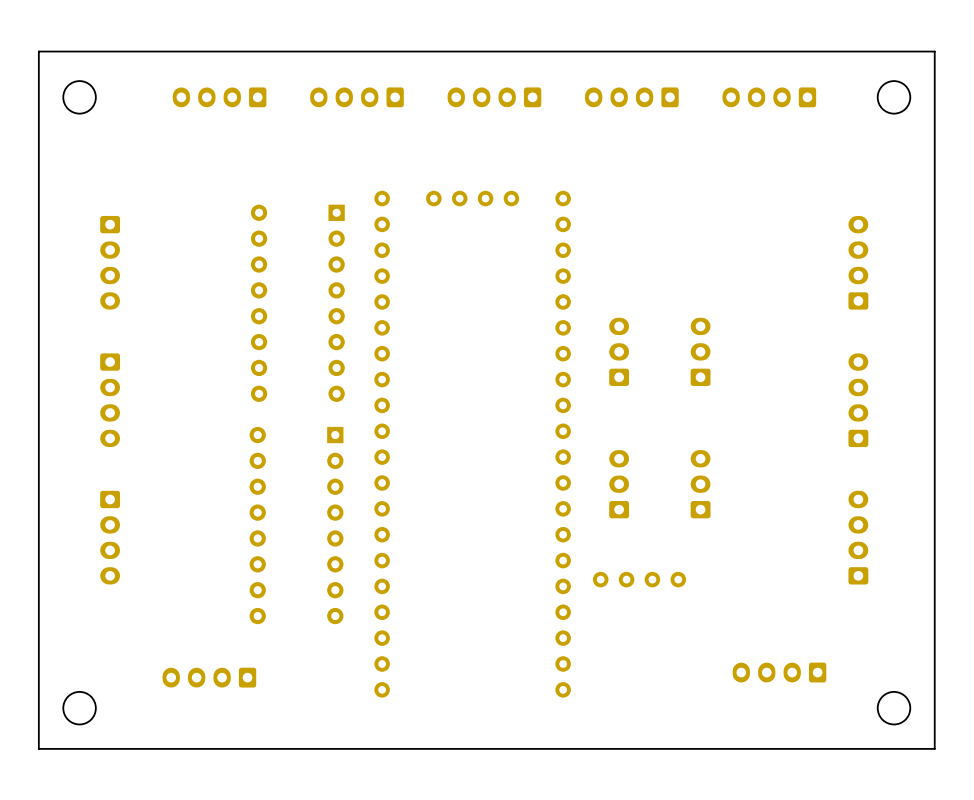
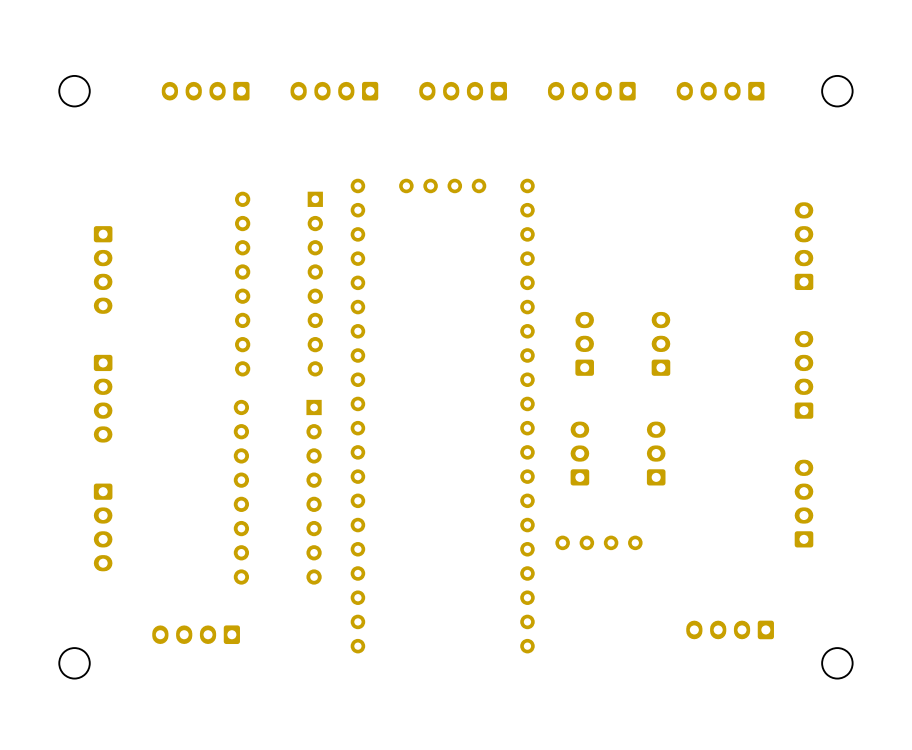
board edge: (934, 51) (38, 51) (38, 748) (934, 748) (934, 51) -> none
part position: (110, 262) -> (103, 269)
part position: (619, 351) -> (584, 343)
part position: (700, 351) -> (660, 343)
part position: (110, 400) -> (103, 398)
part position: (110, 537) -> (103, 527)

